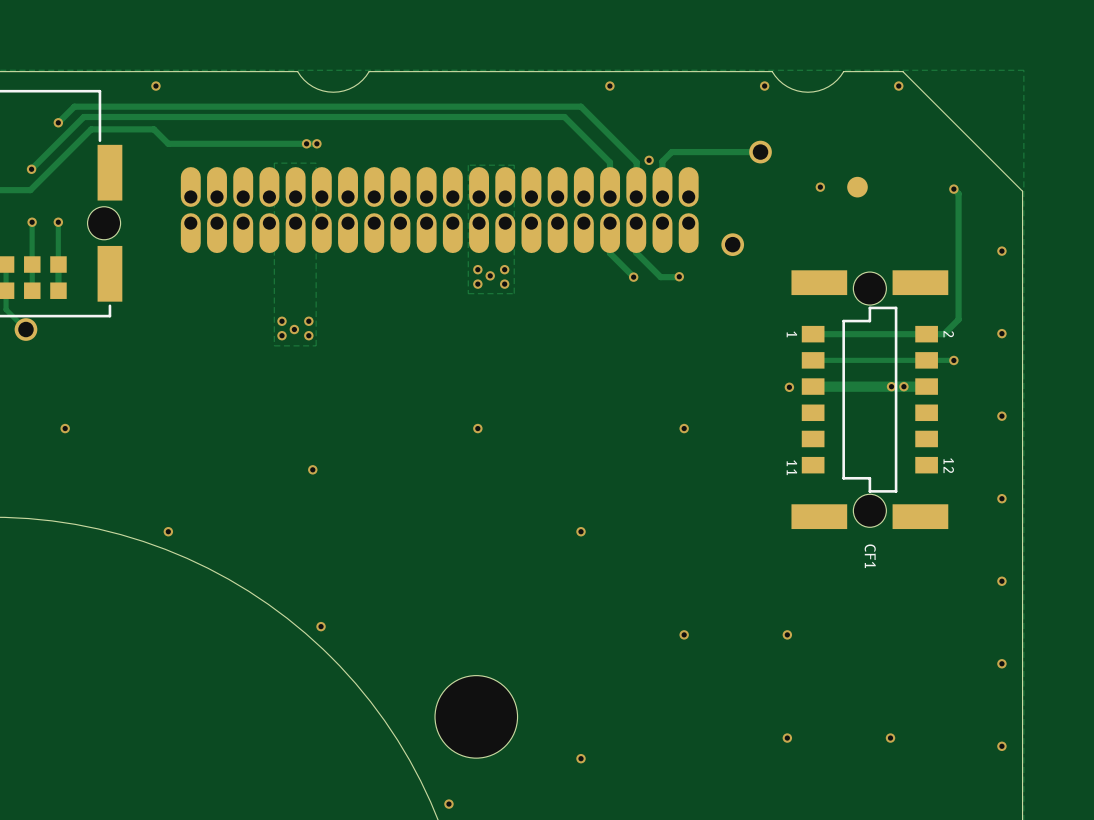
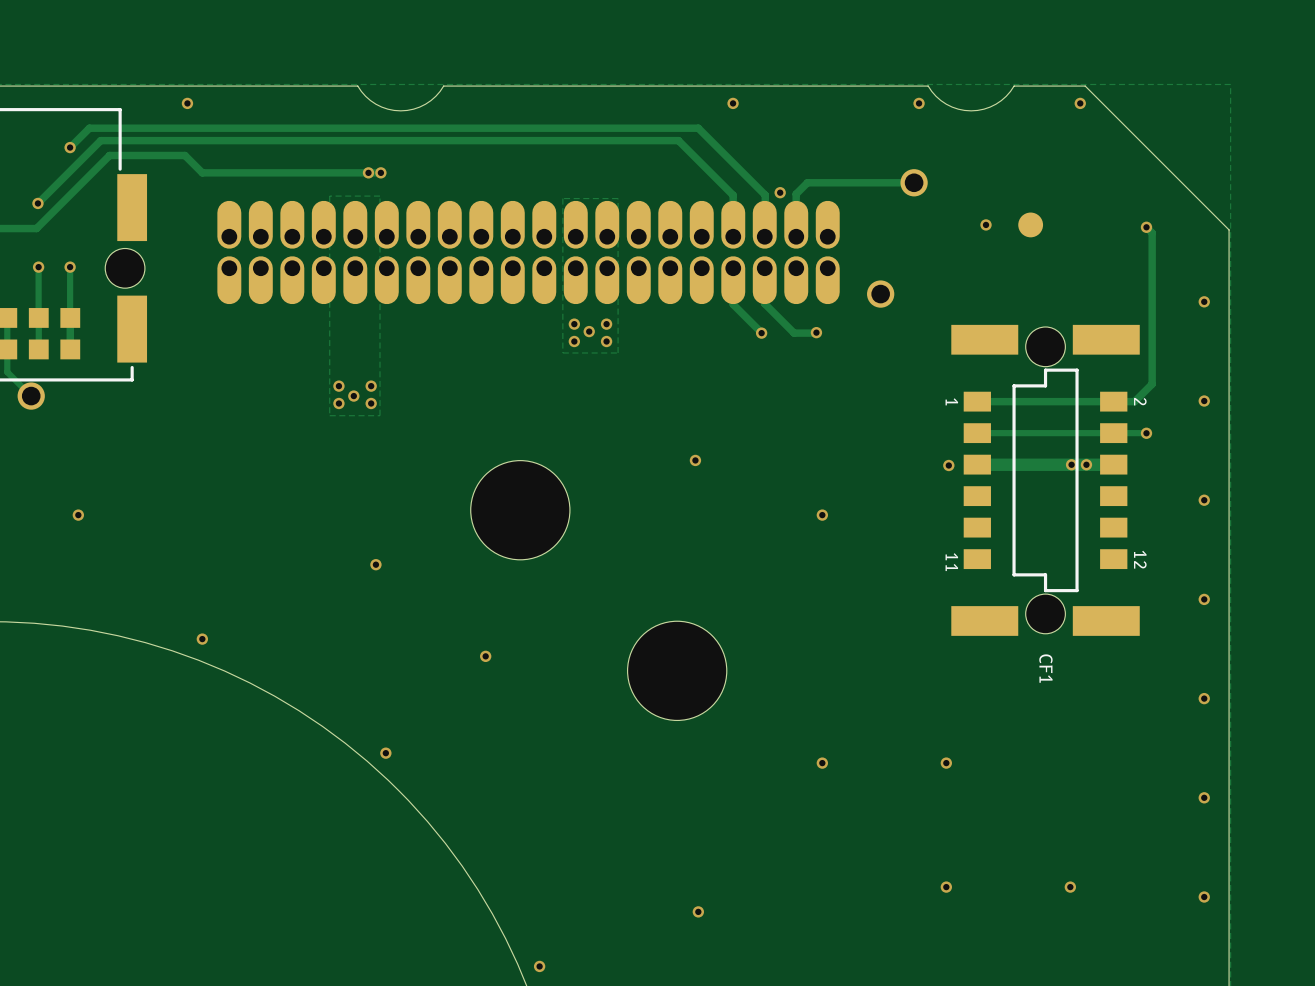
via: none -> (695, 460)
part: none -> (520, 510)
via: (477, 428) -> none
via: (581, 531) -> none
via: none -> (485, 656)
part: none -> (677, 670)
part: (476, 716) -> none

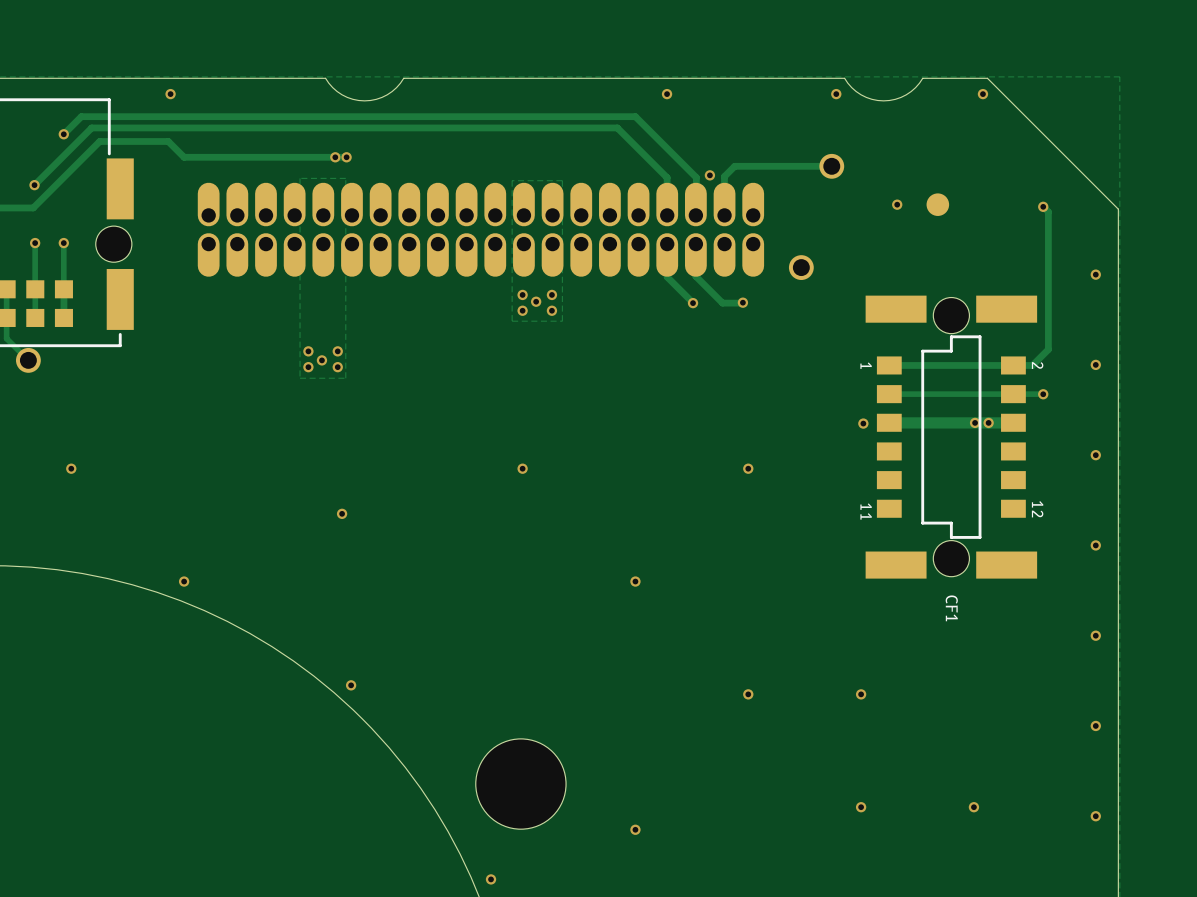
via: (695, 460) -> none
part: (520, 510) -> none
via: none -> (522, 468)
via: none -> (635, 581)
via: (485, 656) -> none
part: (677, 670) -> none
part: none -> (520, 784)

